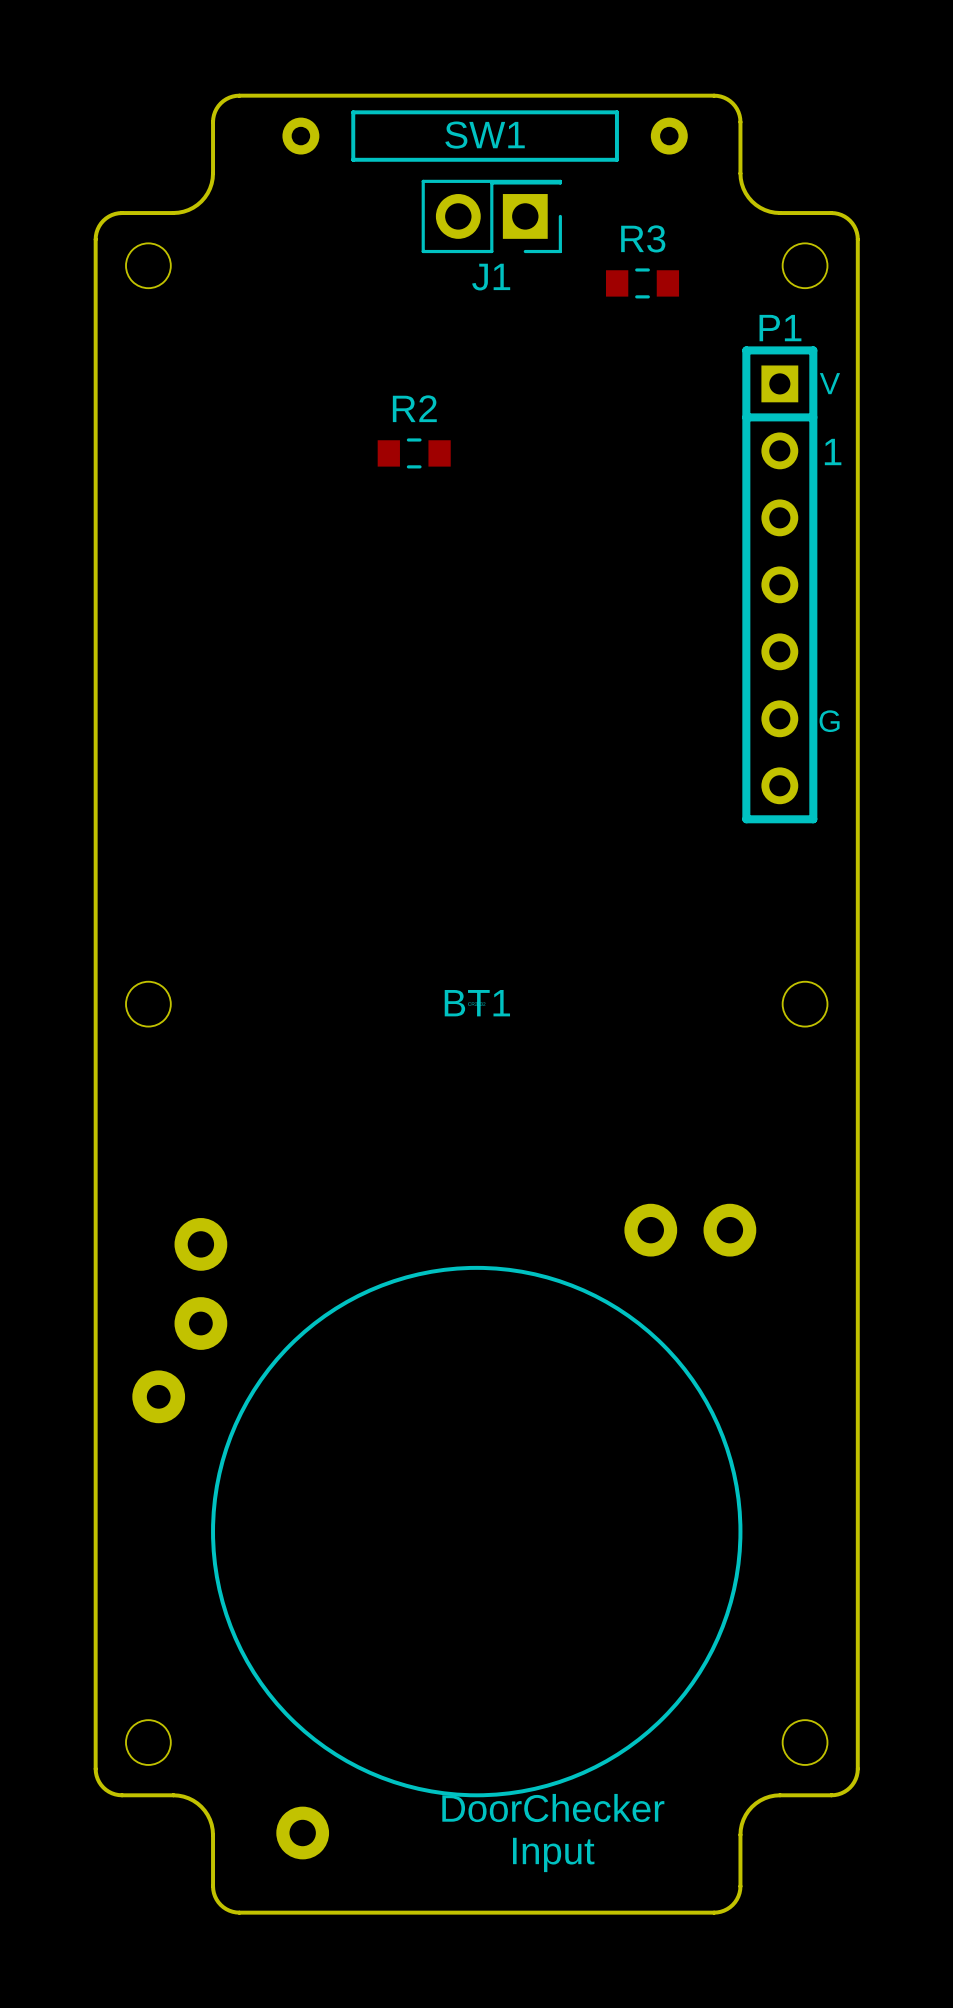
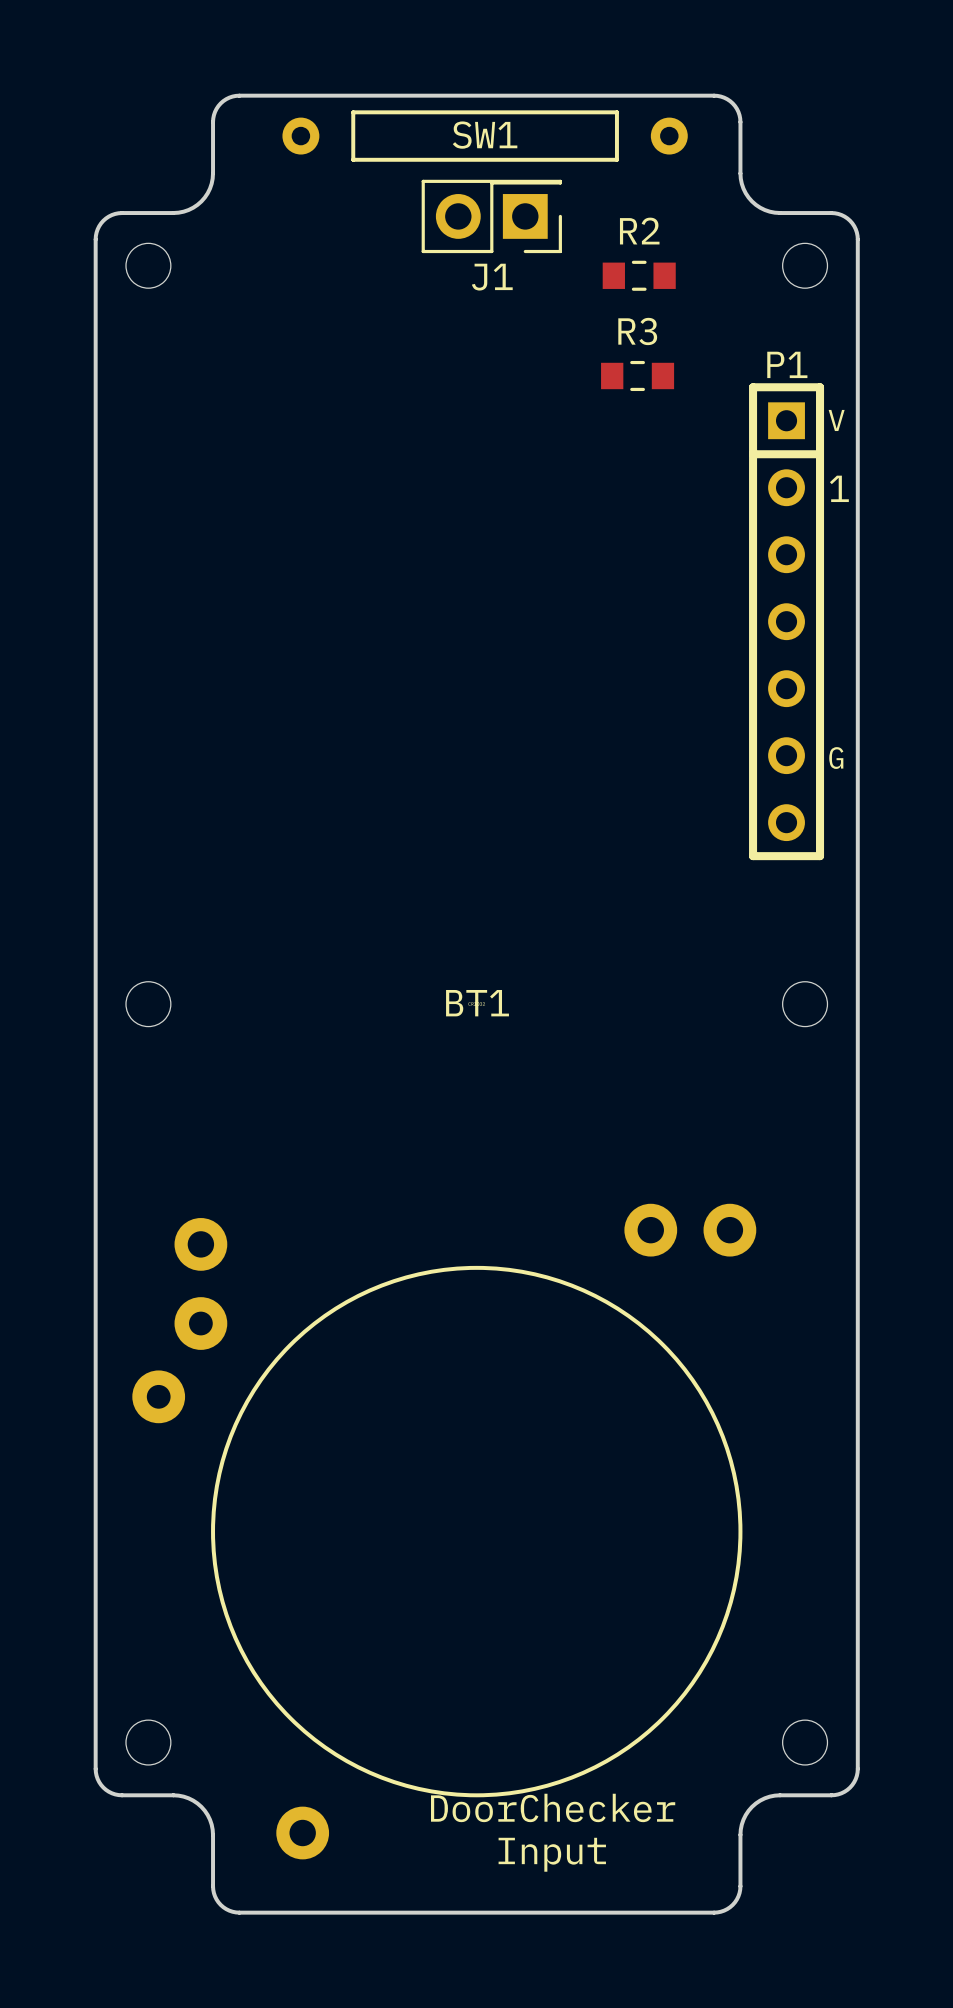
R3 position: (642, 283) -> (637, 375)
R2 position: (414, 453) -> (639, 275)
P1 position: (779, 584) -> (786, 621)

